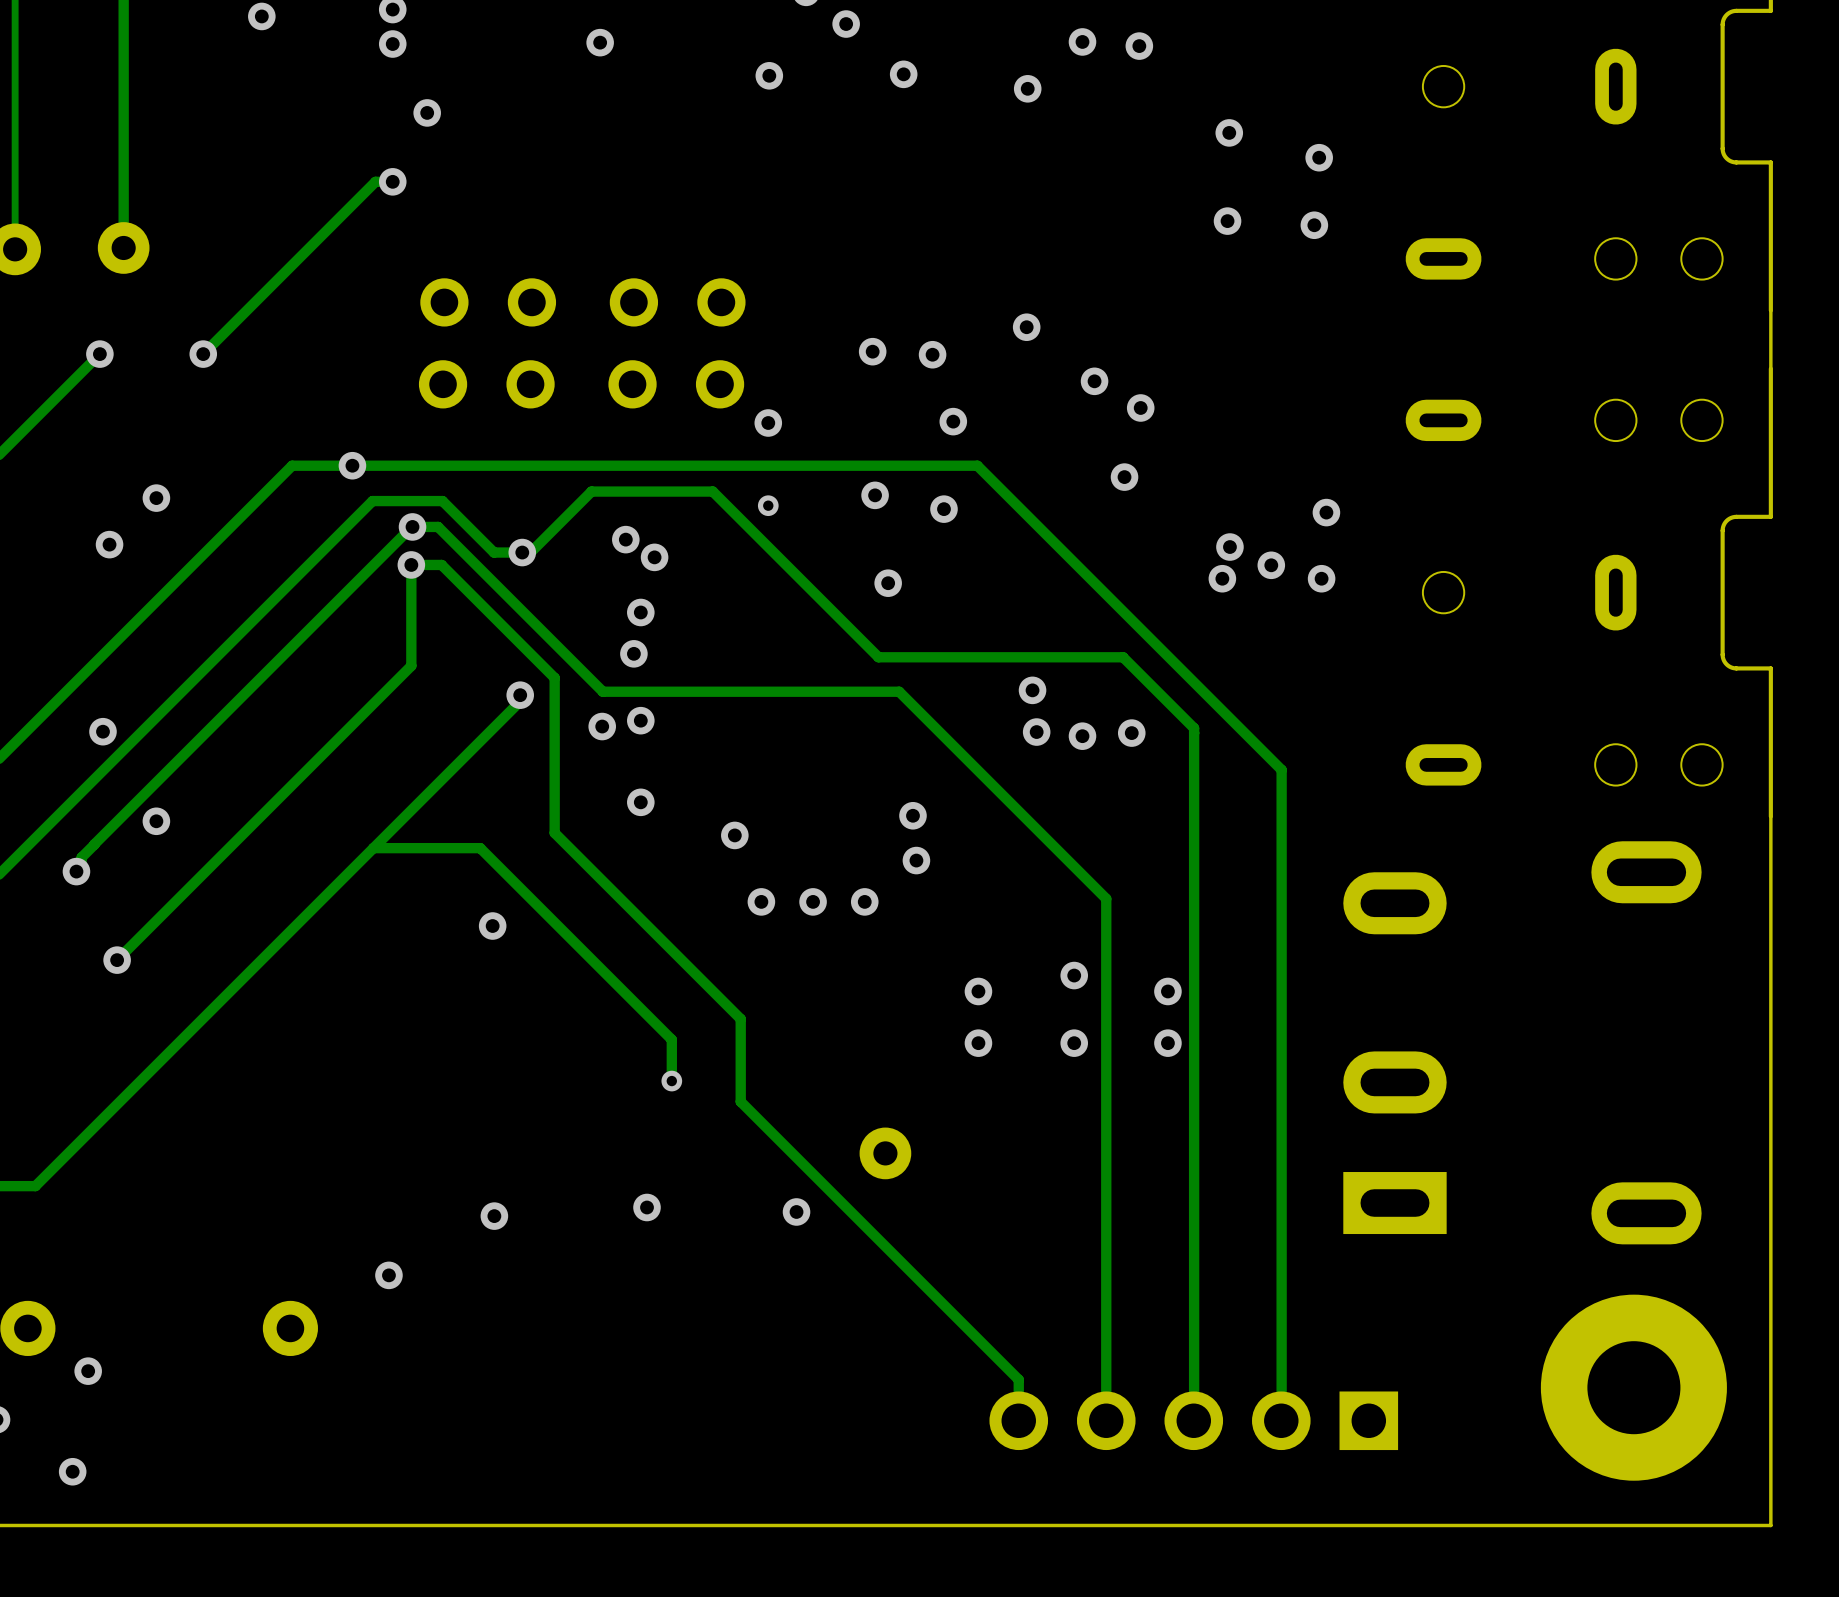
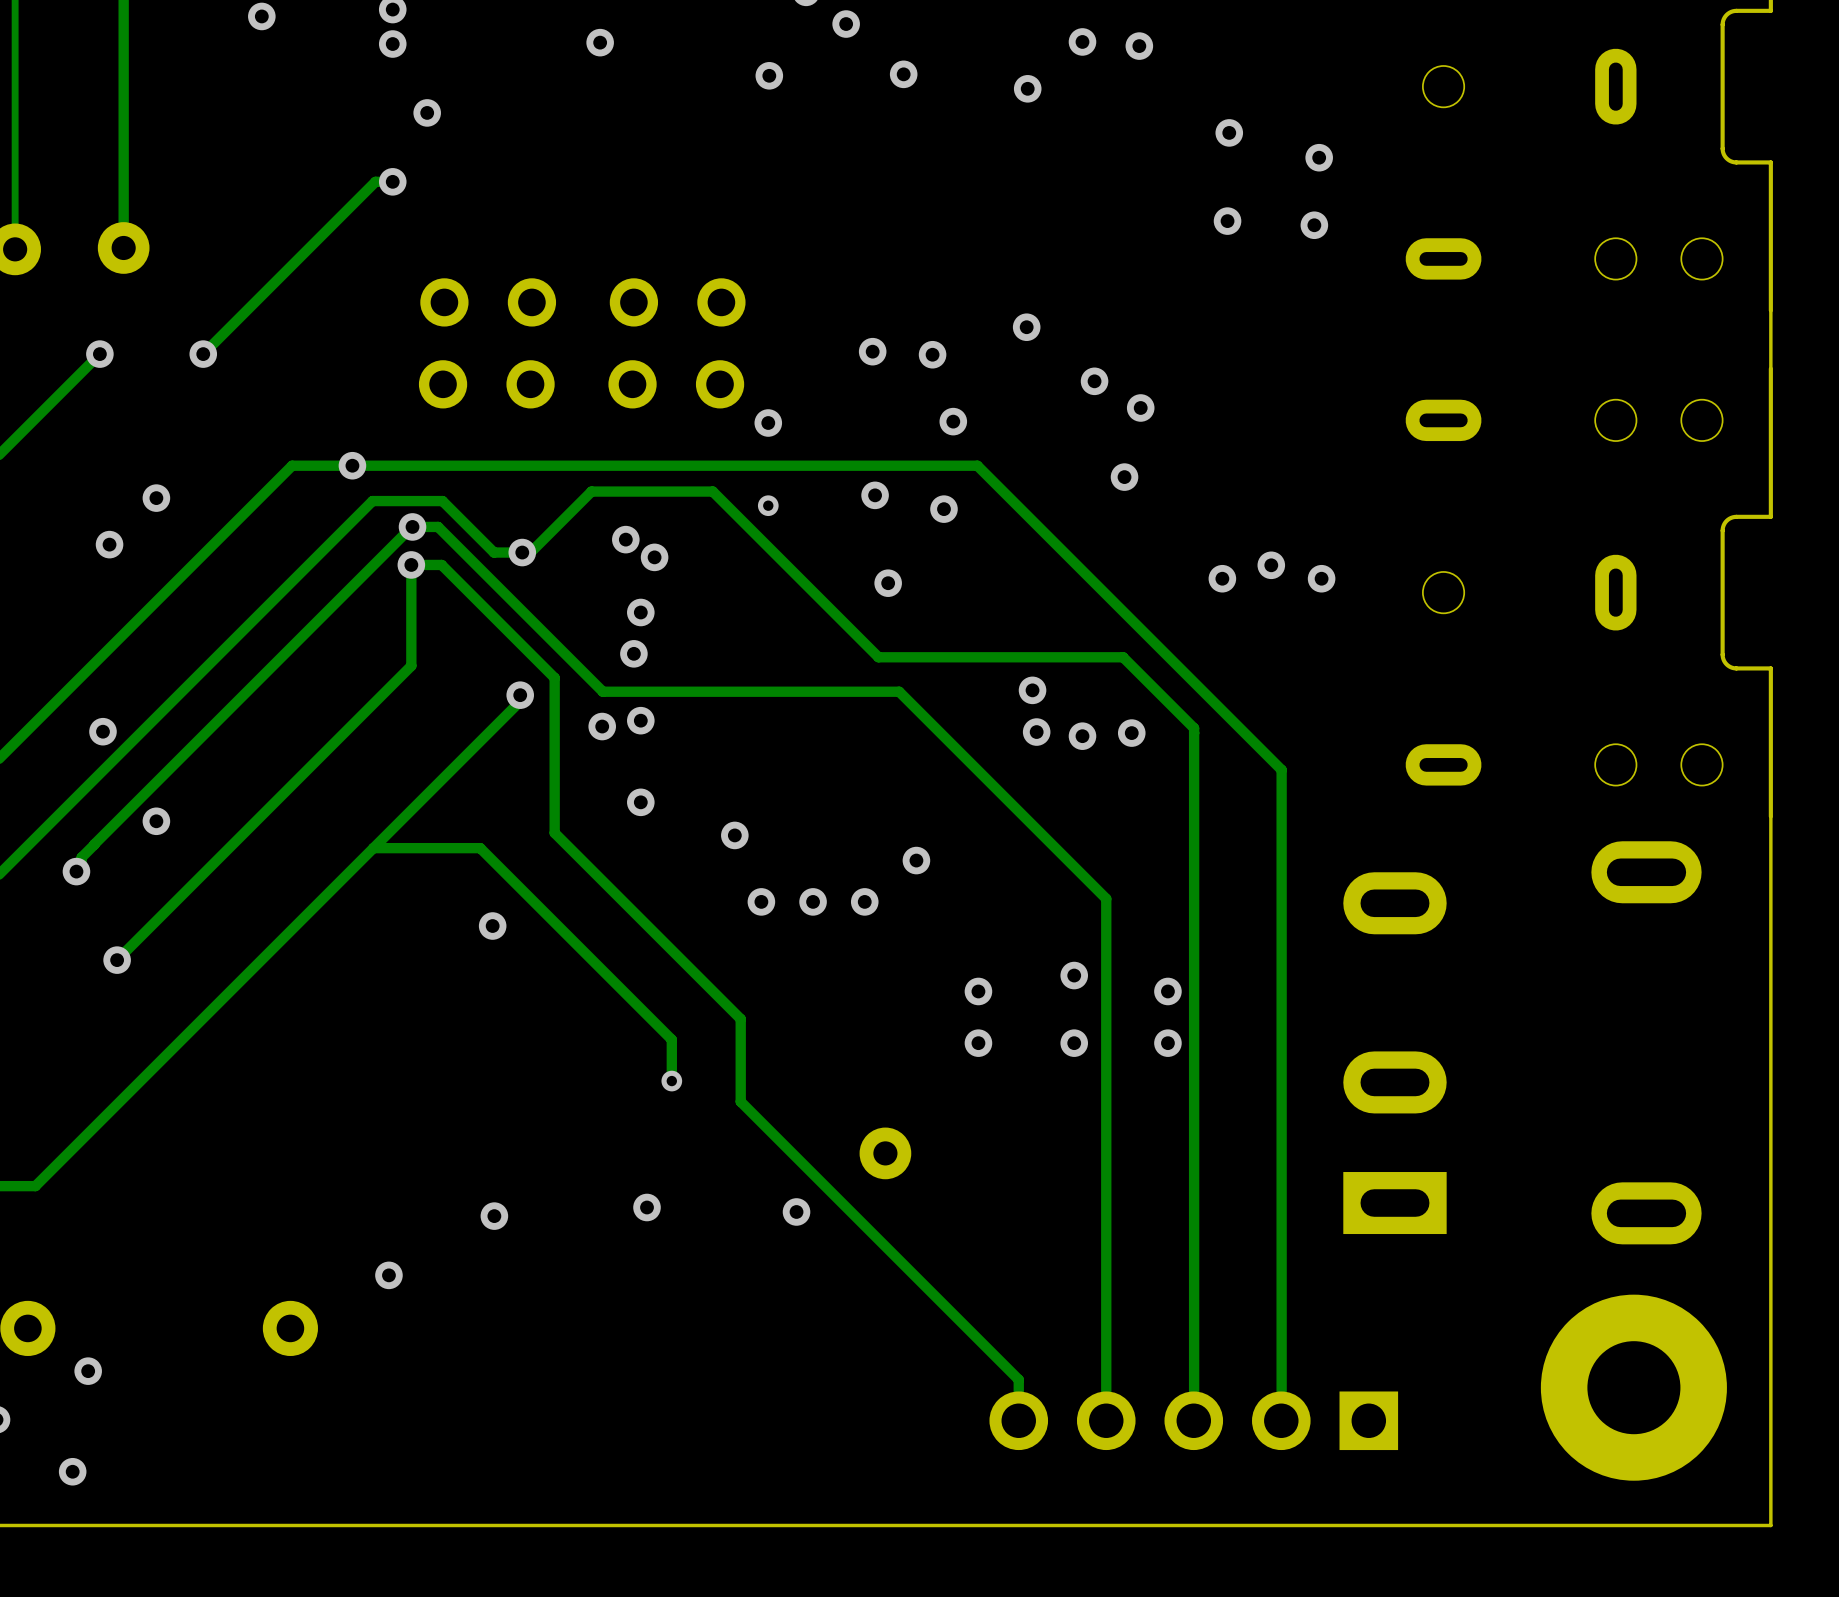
via: (1326, 512) -> none
via: (1229, 547) -> none
via: (912, 815) -> none

